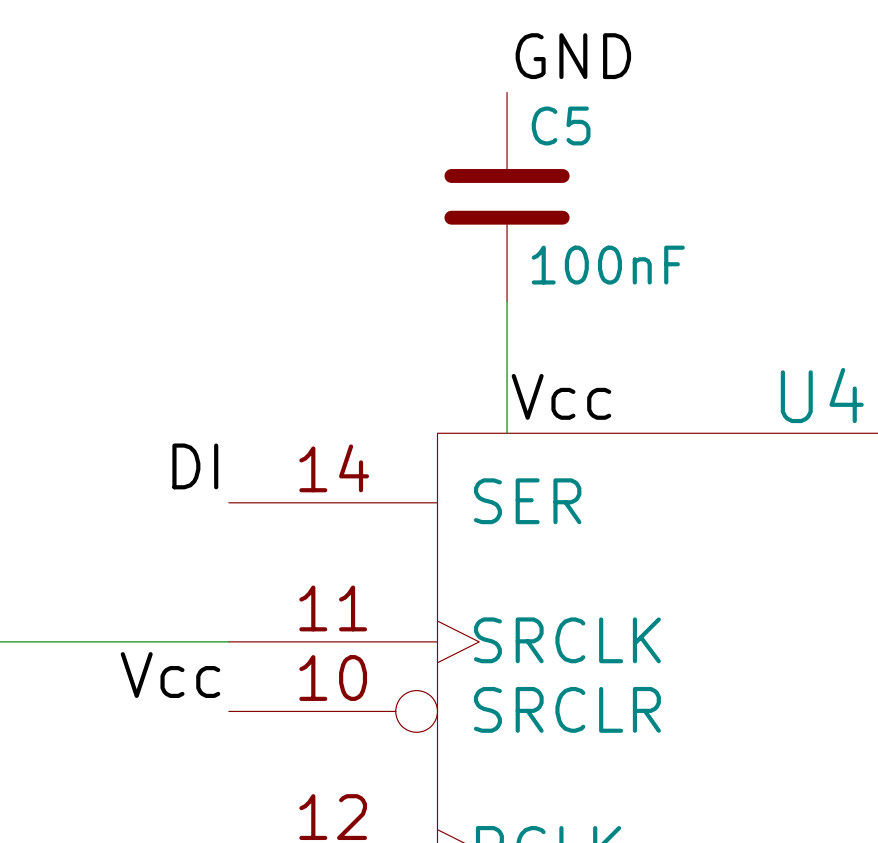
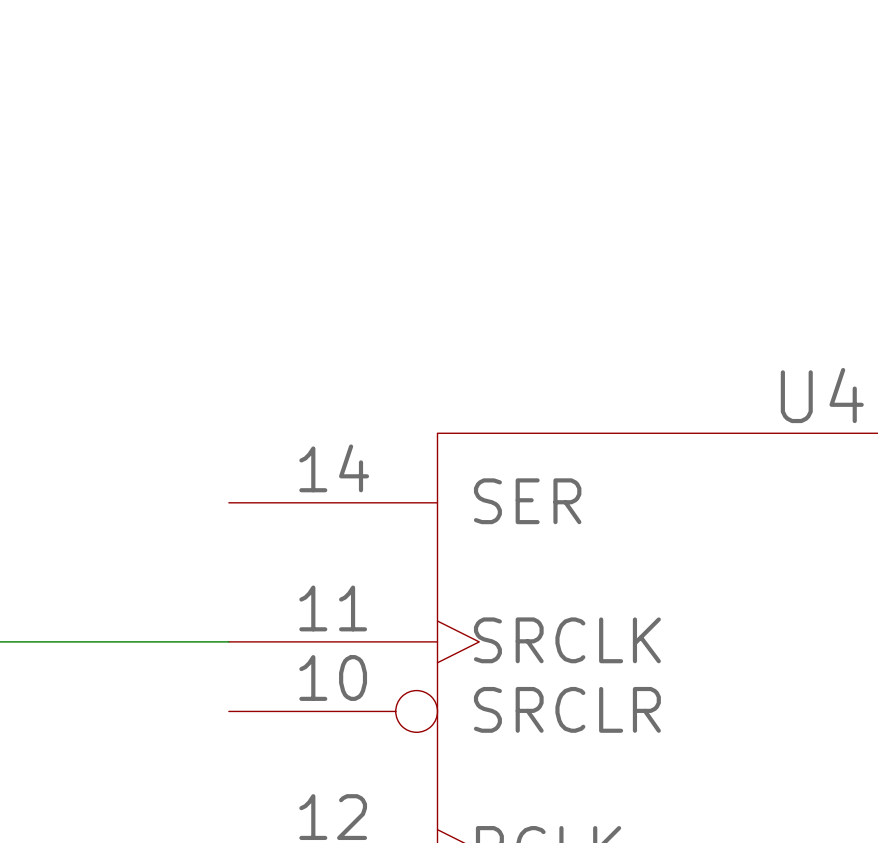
label: GND (573, 56) -> none
C5: 100nF (507, 196) -> none
wire: (507, 301) (507, 433) -> none
label: Vcc (561, 396) -> none
label: DI (195, 466) -> none
label: Vcc (170, 675) -> none

